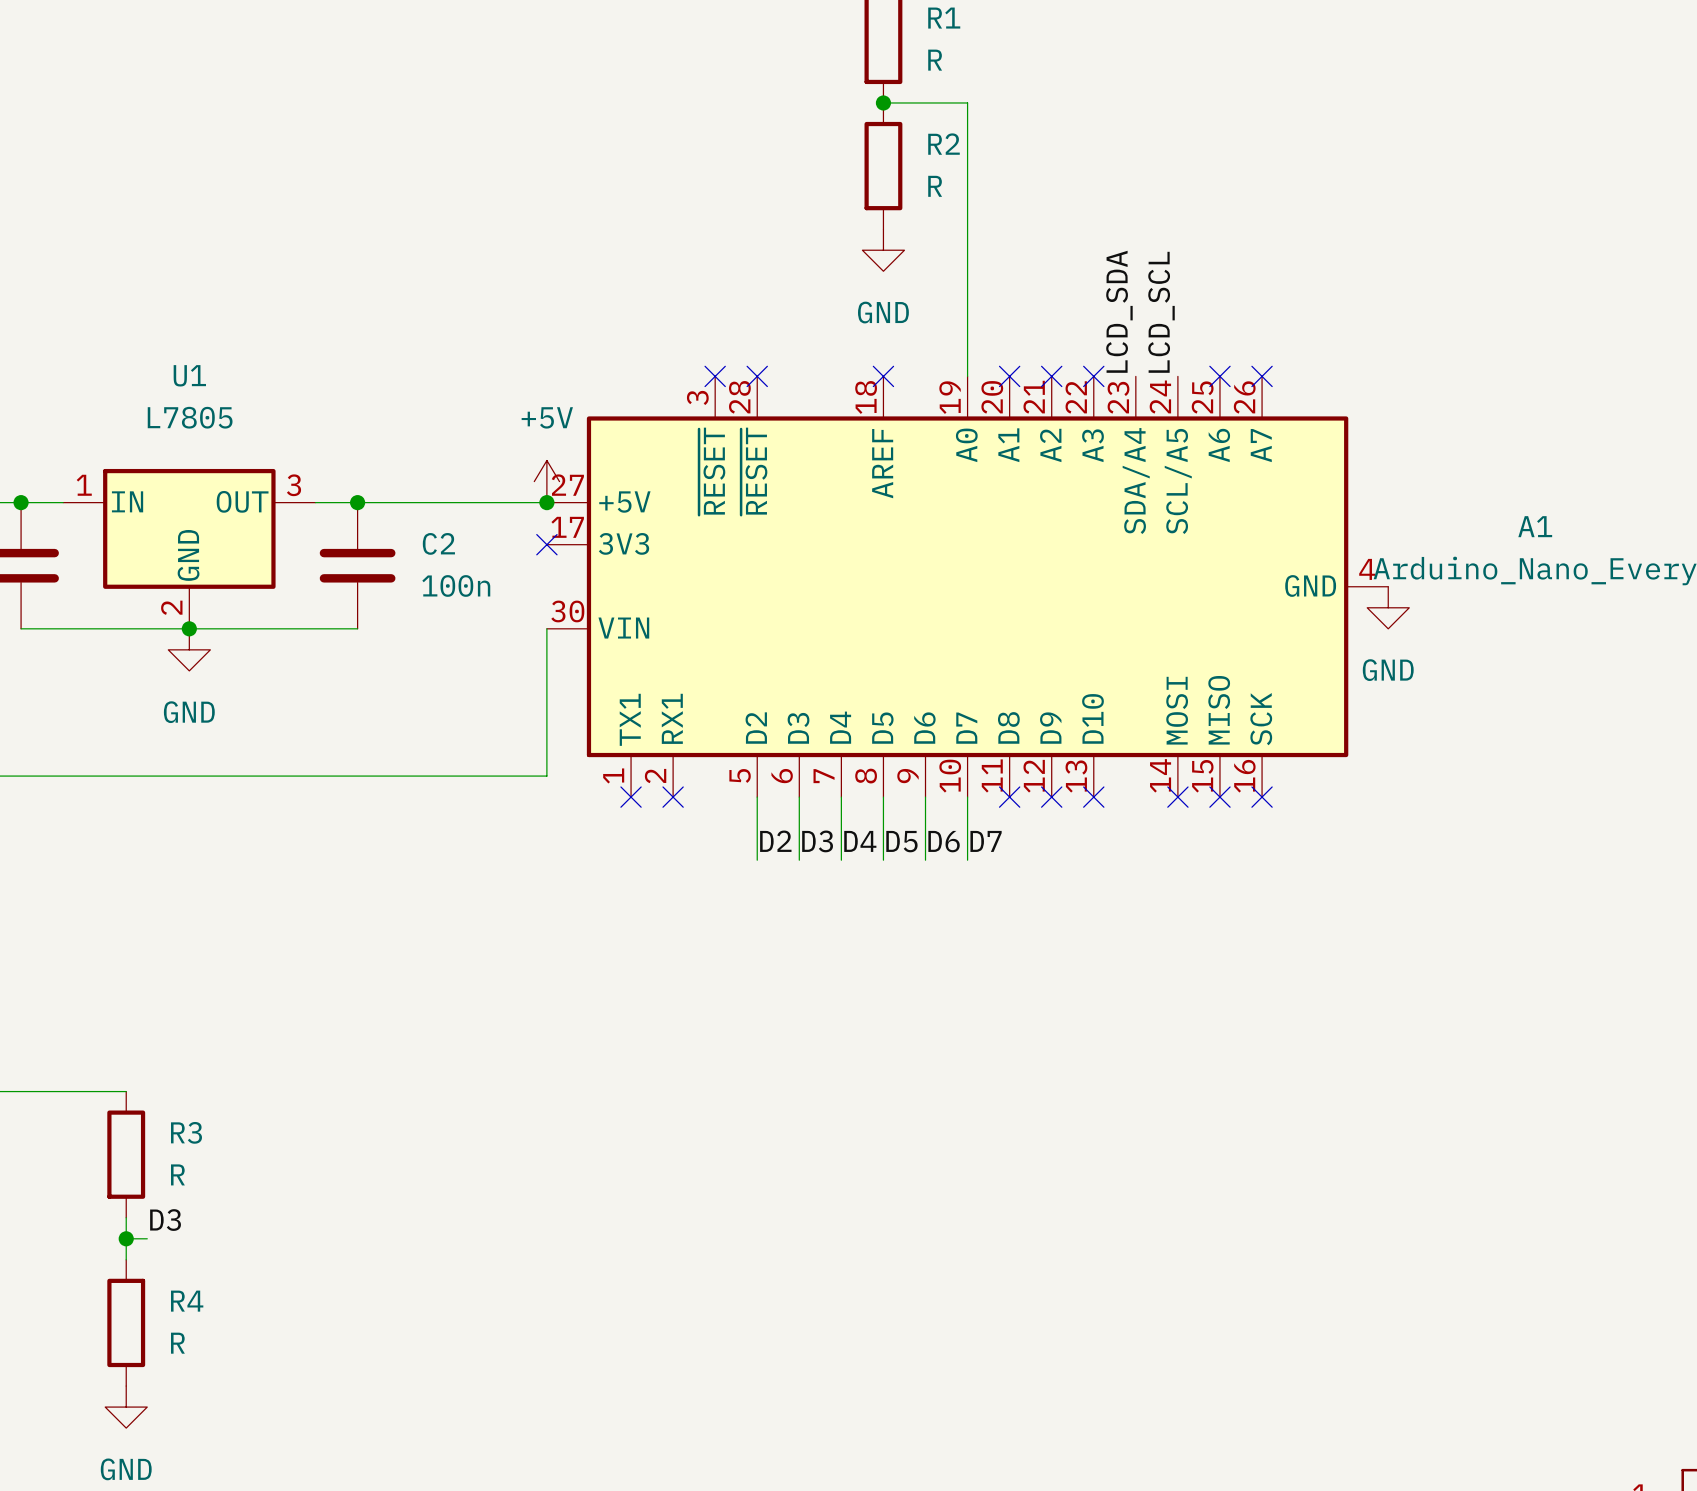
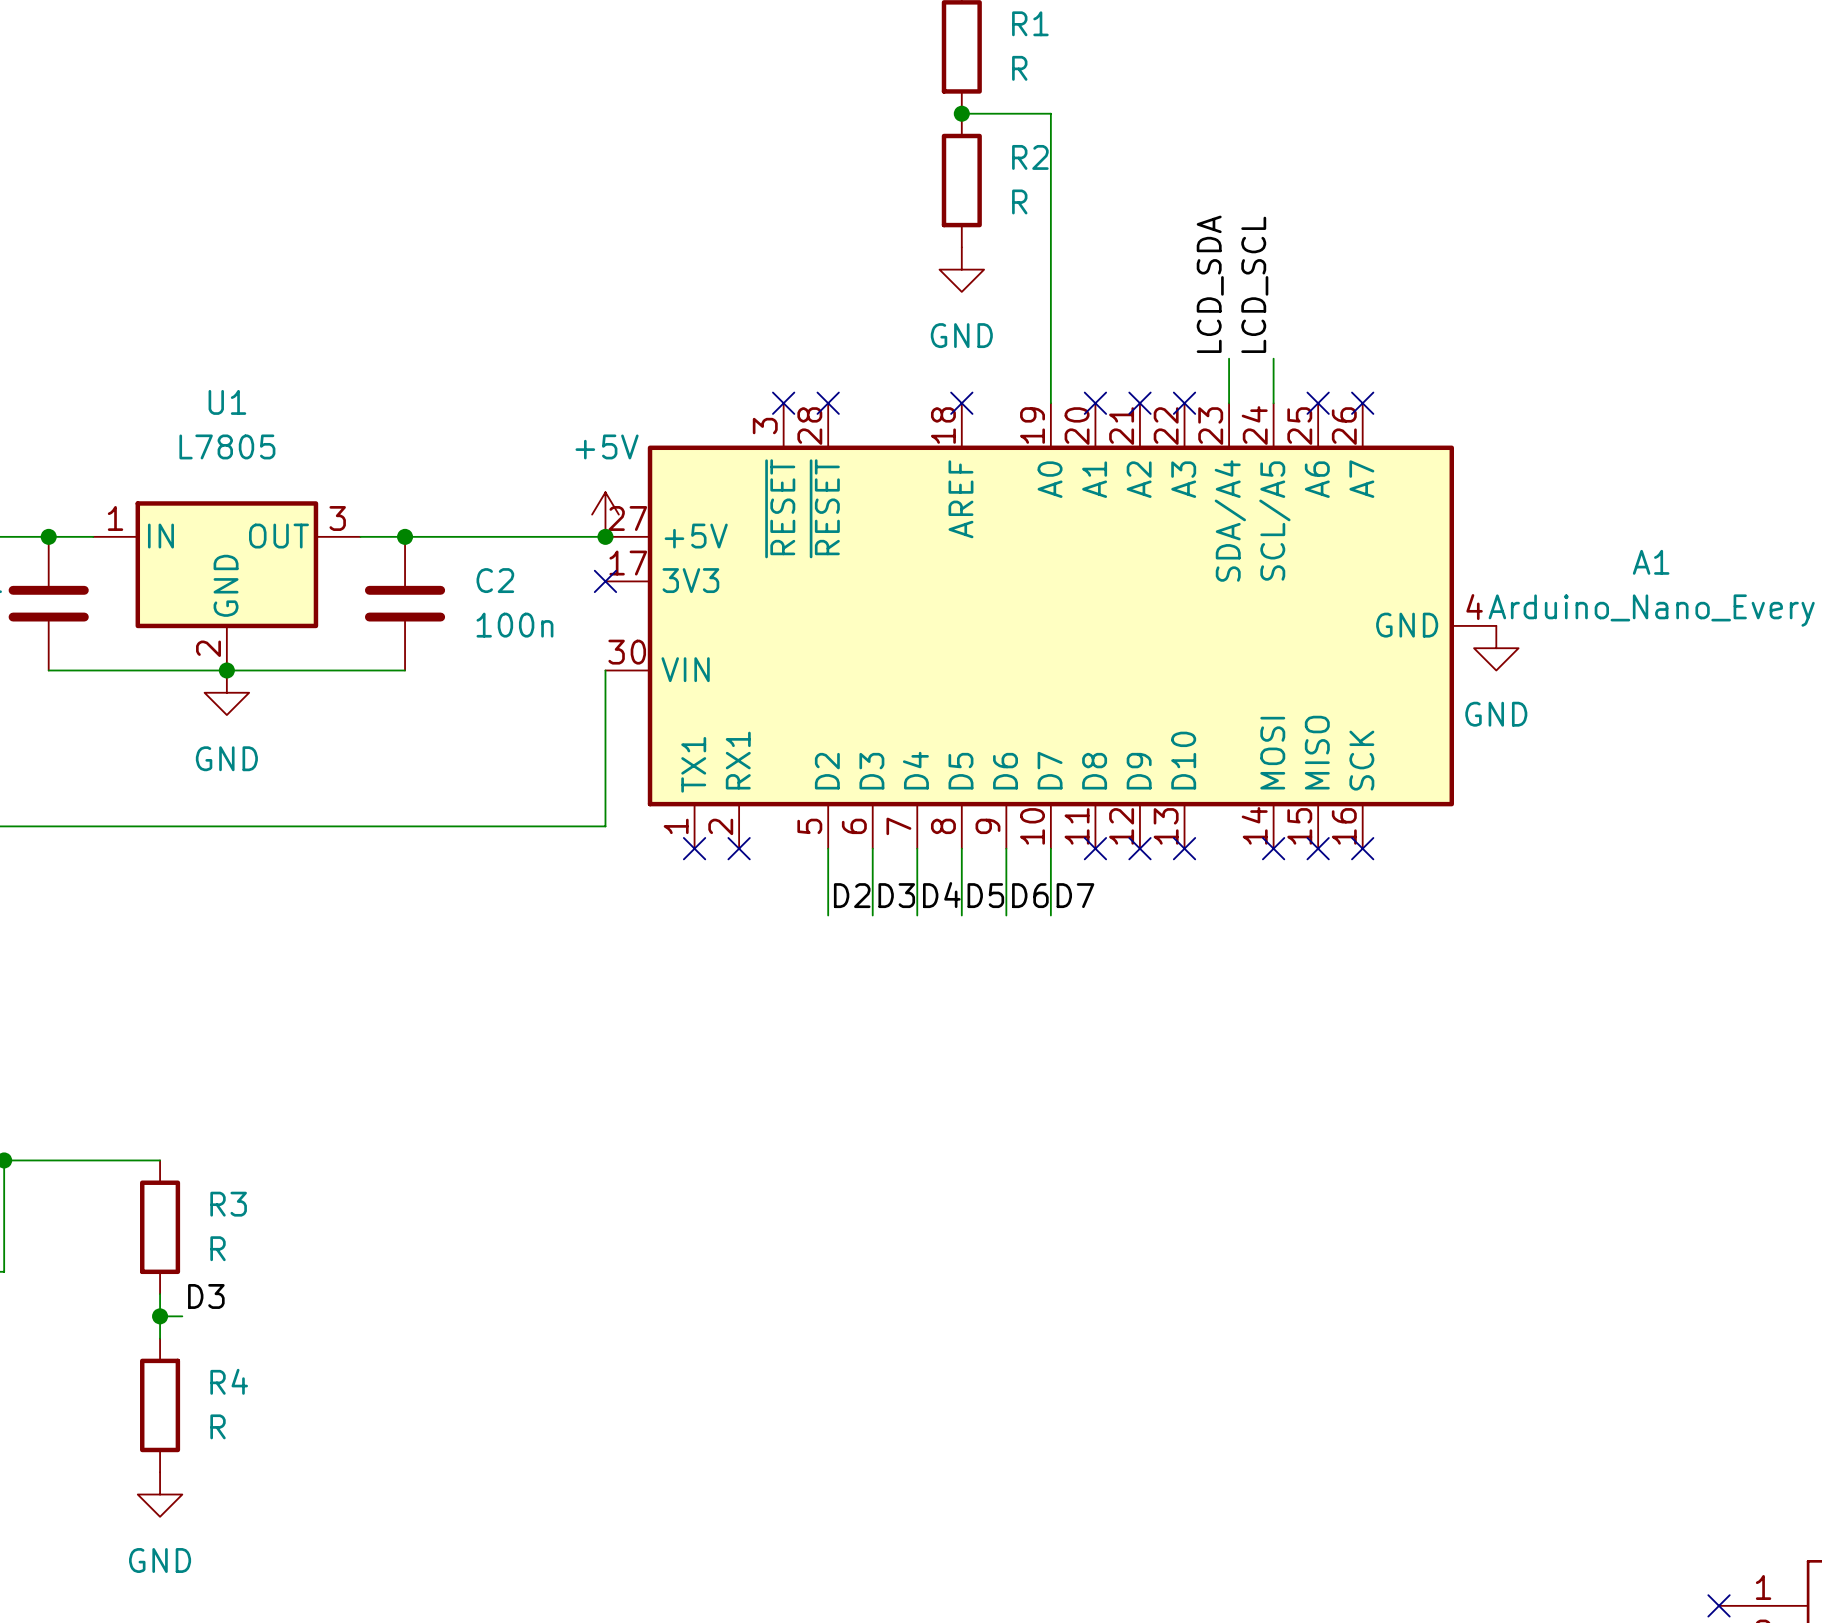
label position: LCD_SDA (1119, 311) -> LCD_SDA (1210, 284)
label position: LCD_SCL (1161, 312) -> LCD_SCL (1254, 284)
wire: none -> (1229, 358) (1229, 403)
wire: none -> (1273, 358) (1273, 403)

